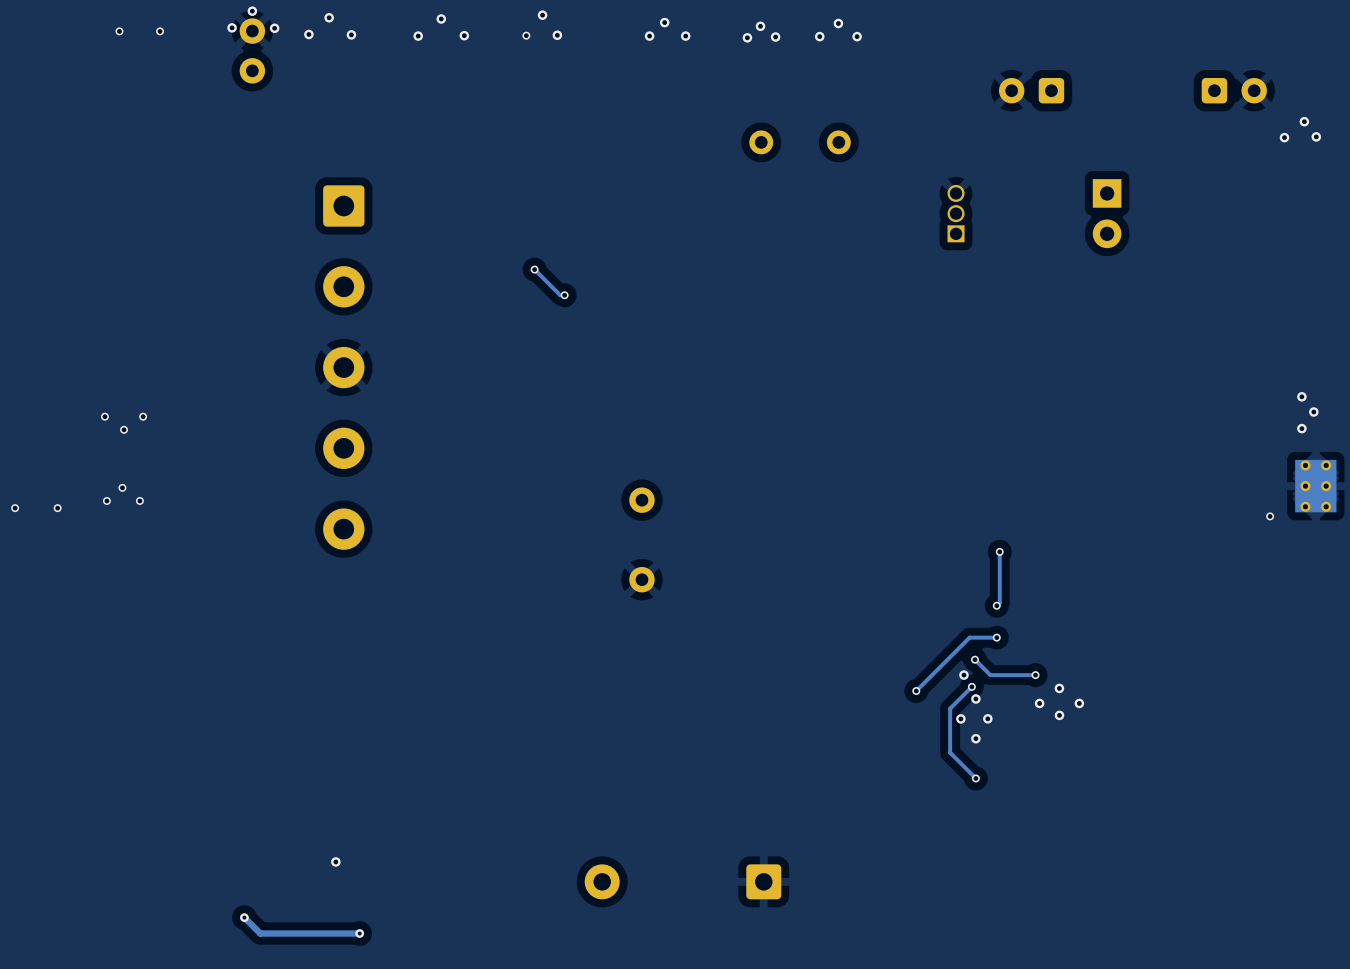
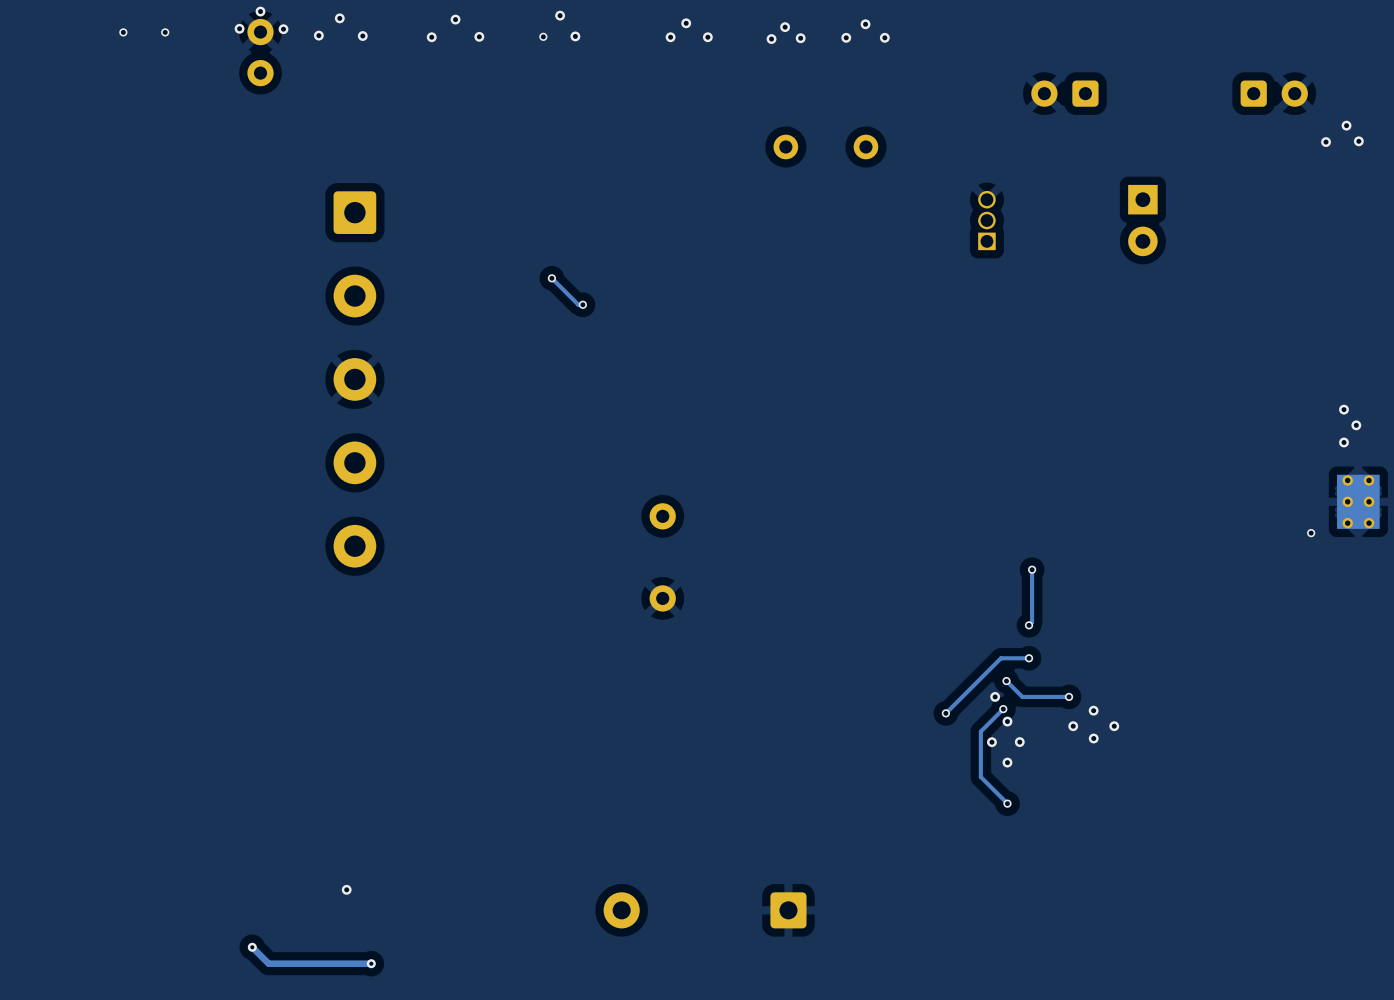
via: (104, 416) -> none
via: (143, 416) -> none
via: (124, 429) -> none
via: (122, 487) -> none
via: (106, 500) -> none
via: (139, 500) -> none
via: (15, 508) -> none
via: (57, 508) -> none

